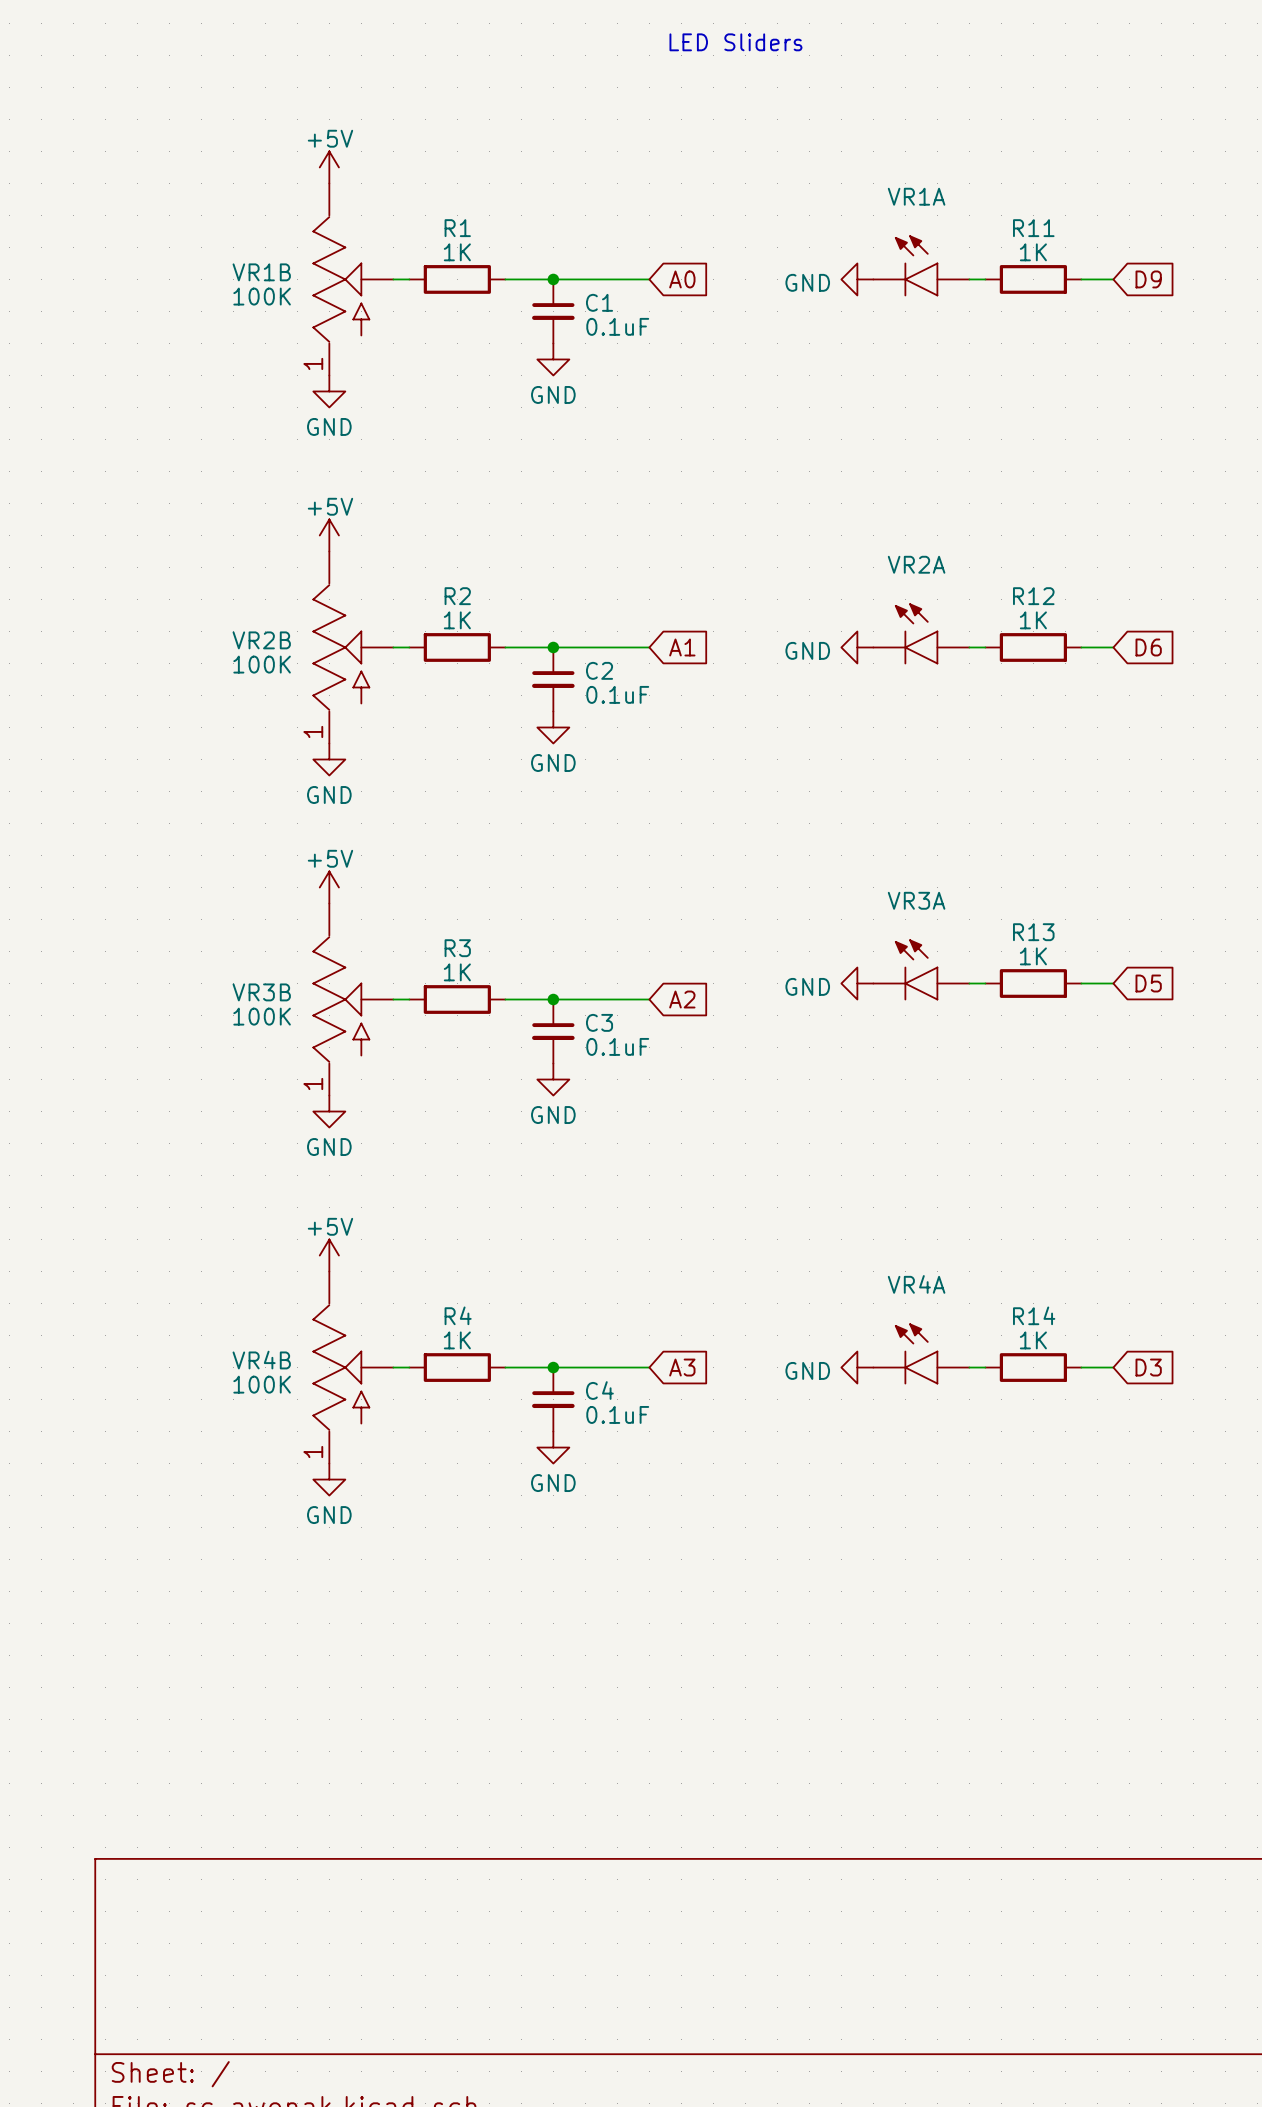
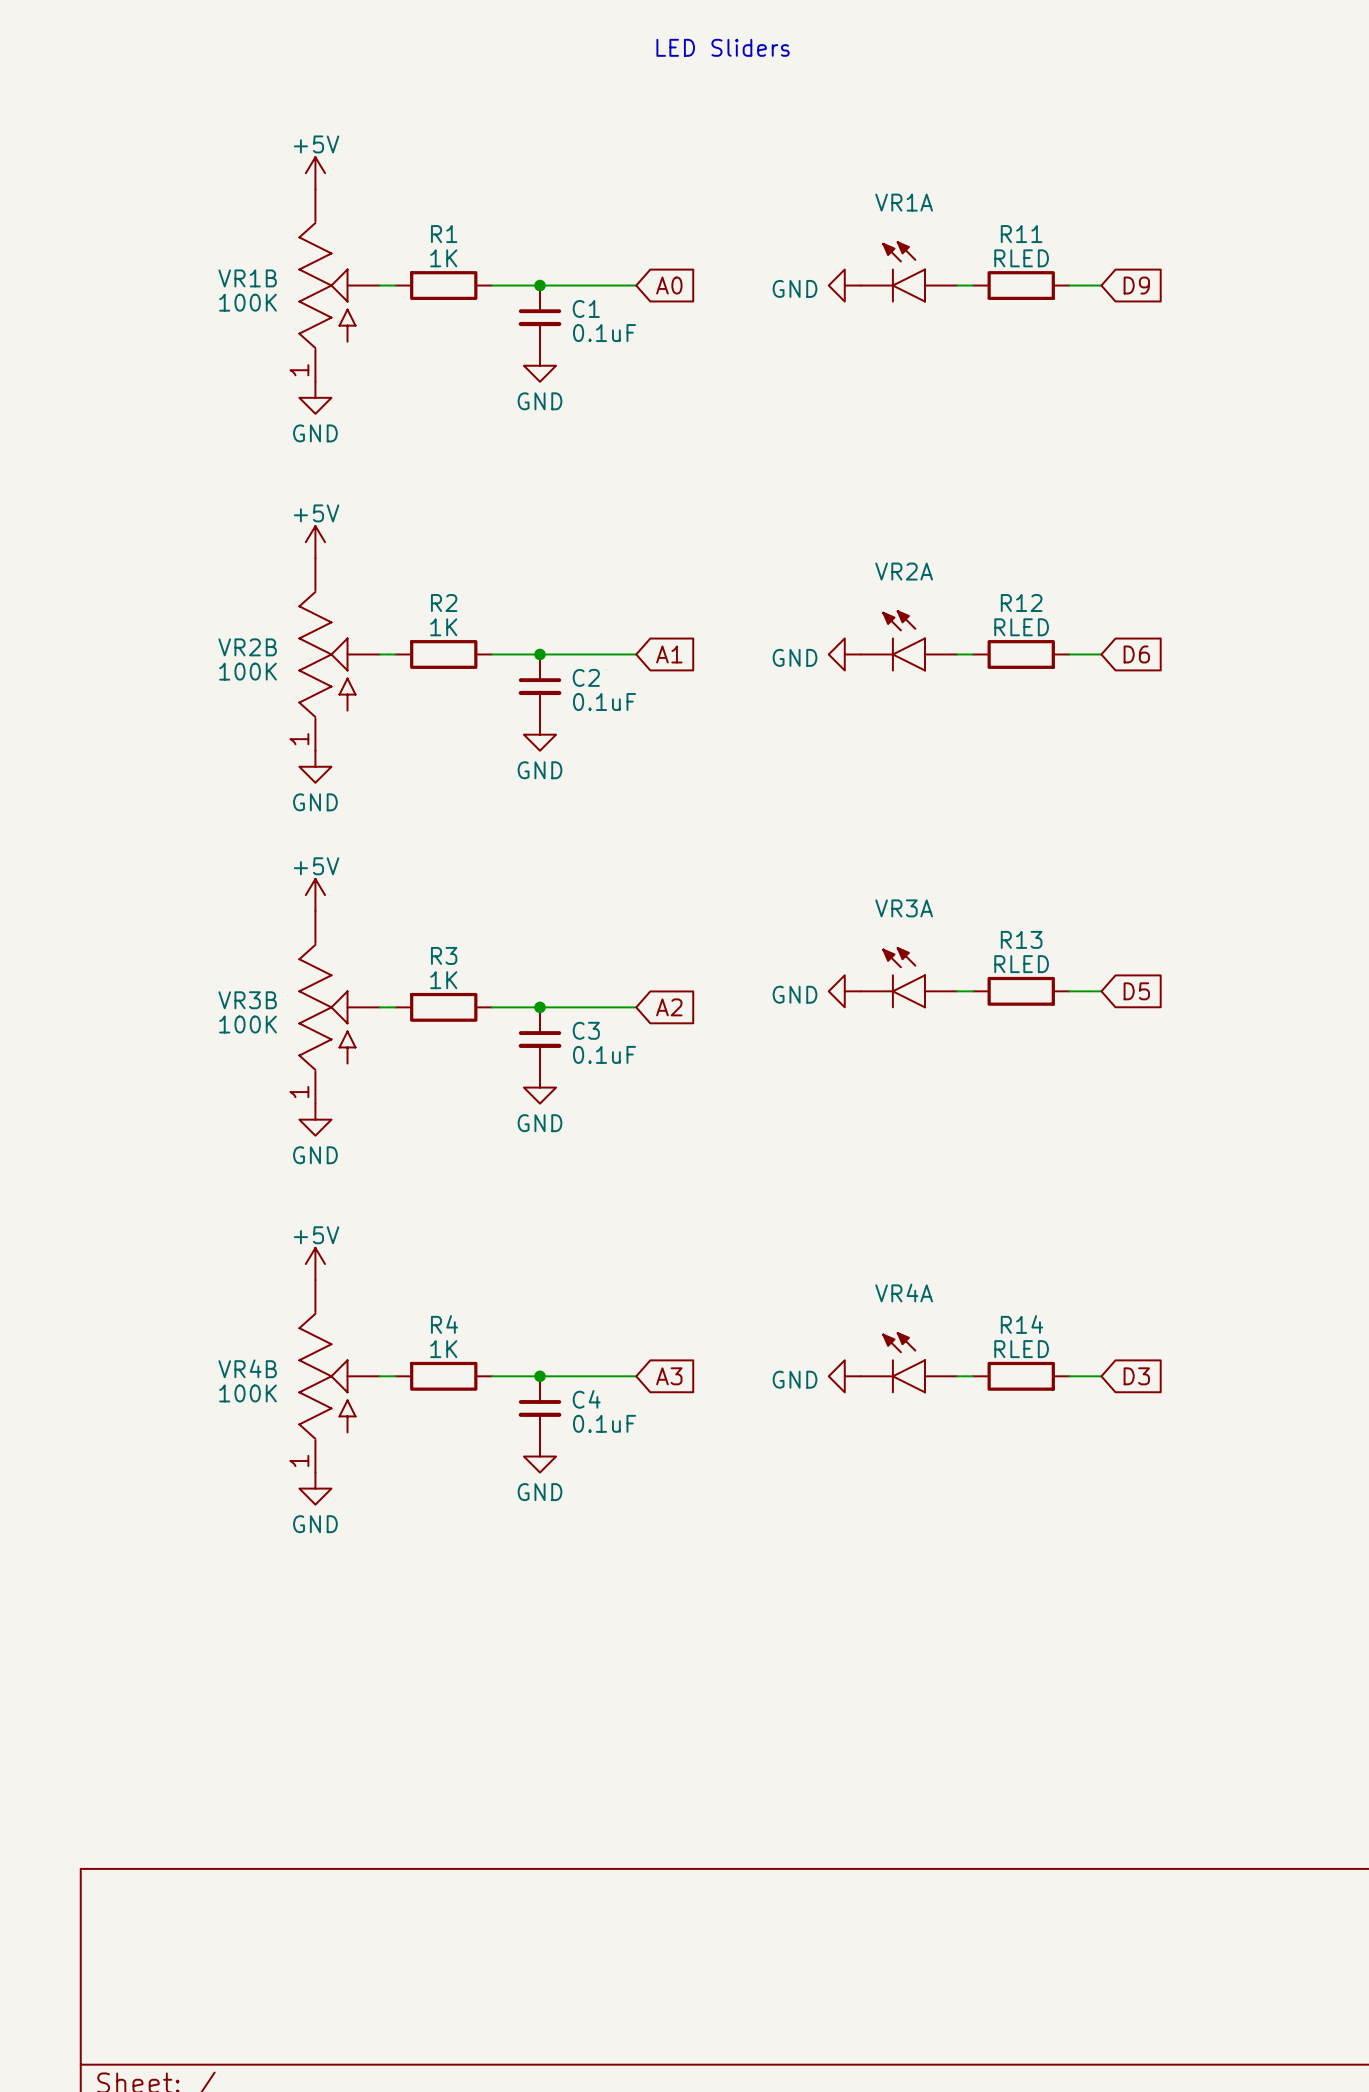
R11 value: 1K (1033, 252) -> RLED (1021, 258)
R12 value: 1K (1033, 620) -> RLED (1021, 627)
R13 value: 1K (1033, 956) -> RLED (1021, 964)
R14 value: 1K (1033, 1340) -> RLED (1021, 1349)

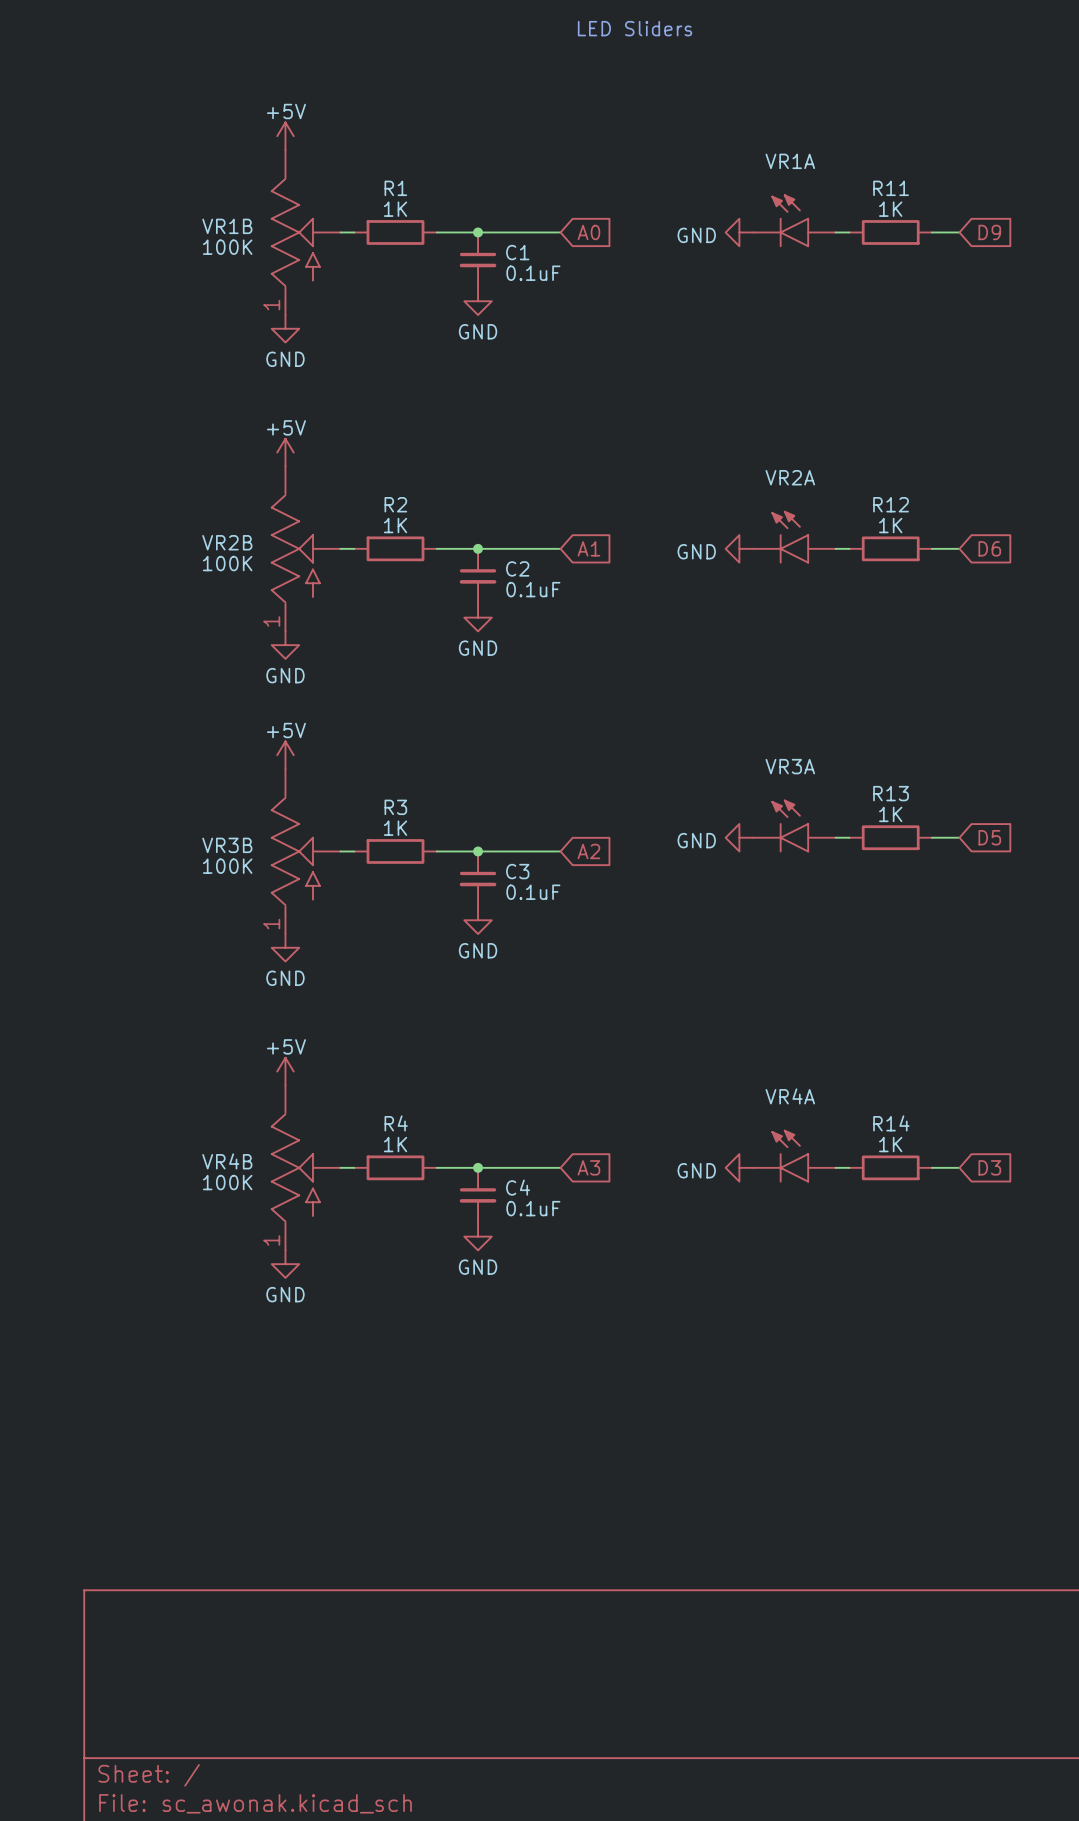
R11 value: RLED (1021, 258) -> 1K (890, 209)
R12 value: RLED (1021, 627) -> 1K (890, 525)
R13 value: RLED (1021, 964) -> 1K (890, 814)
R14 value: RLED (1021, 1349) -> 1K (890, 1144)

